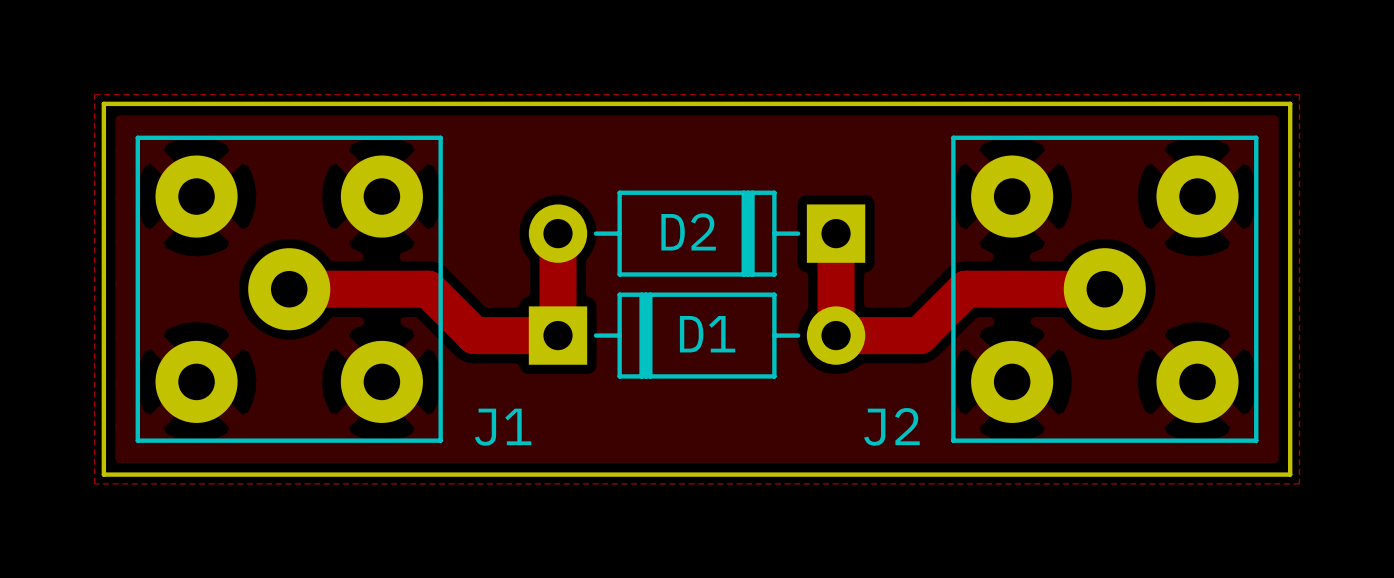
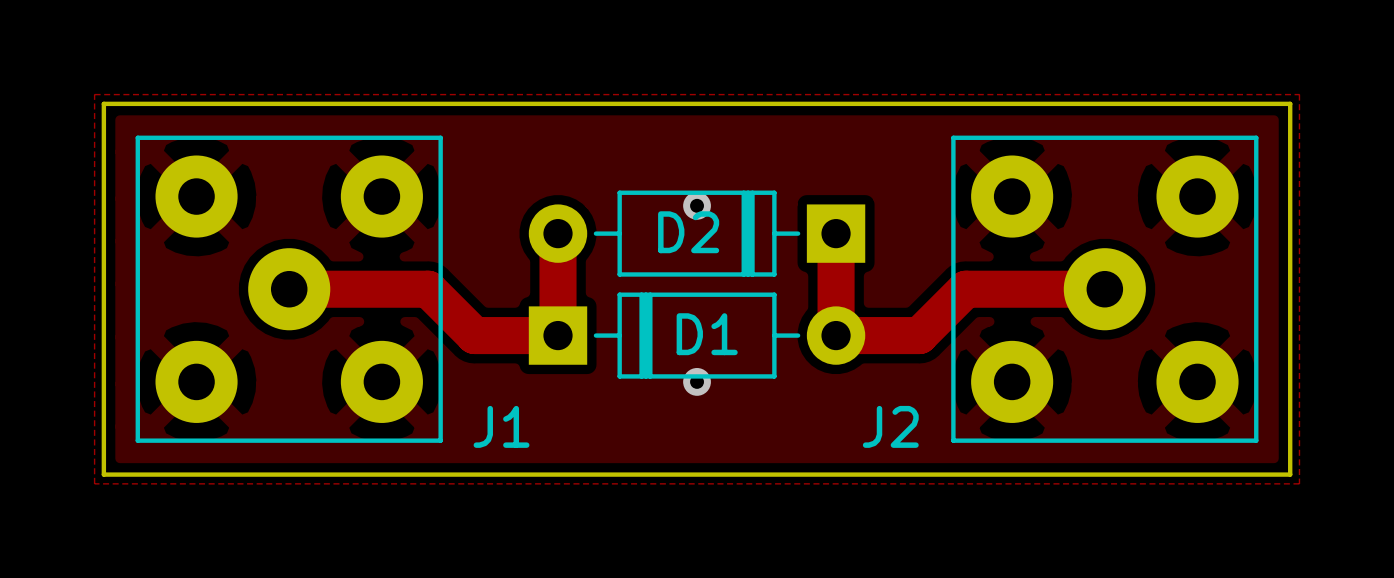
via: none -> (697, 205)
via: none -> (697, 381)

